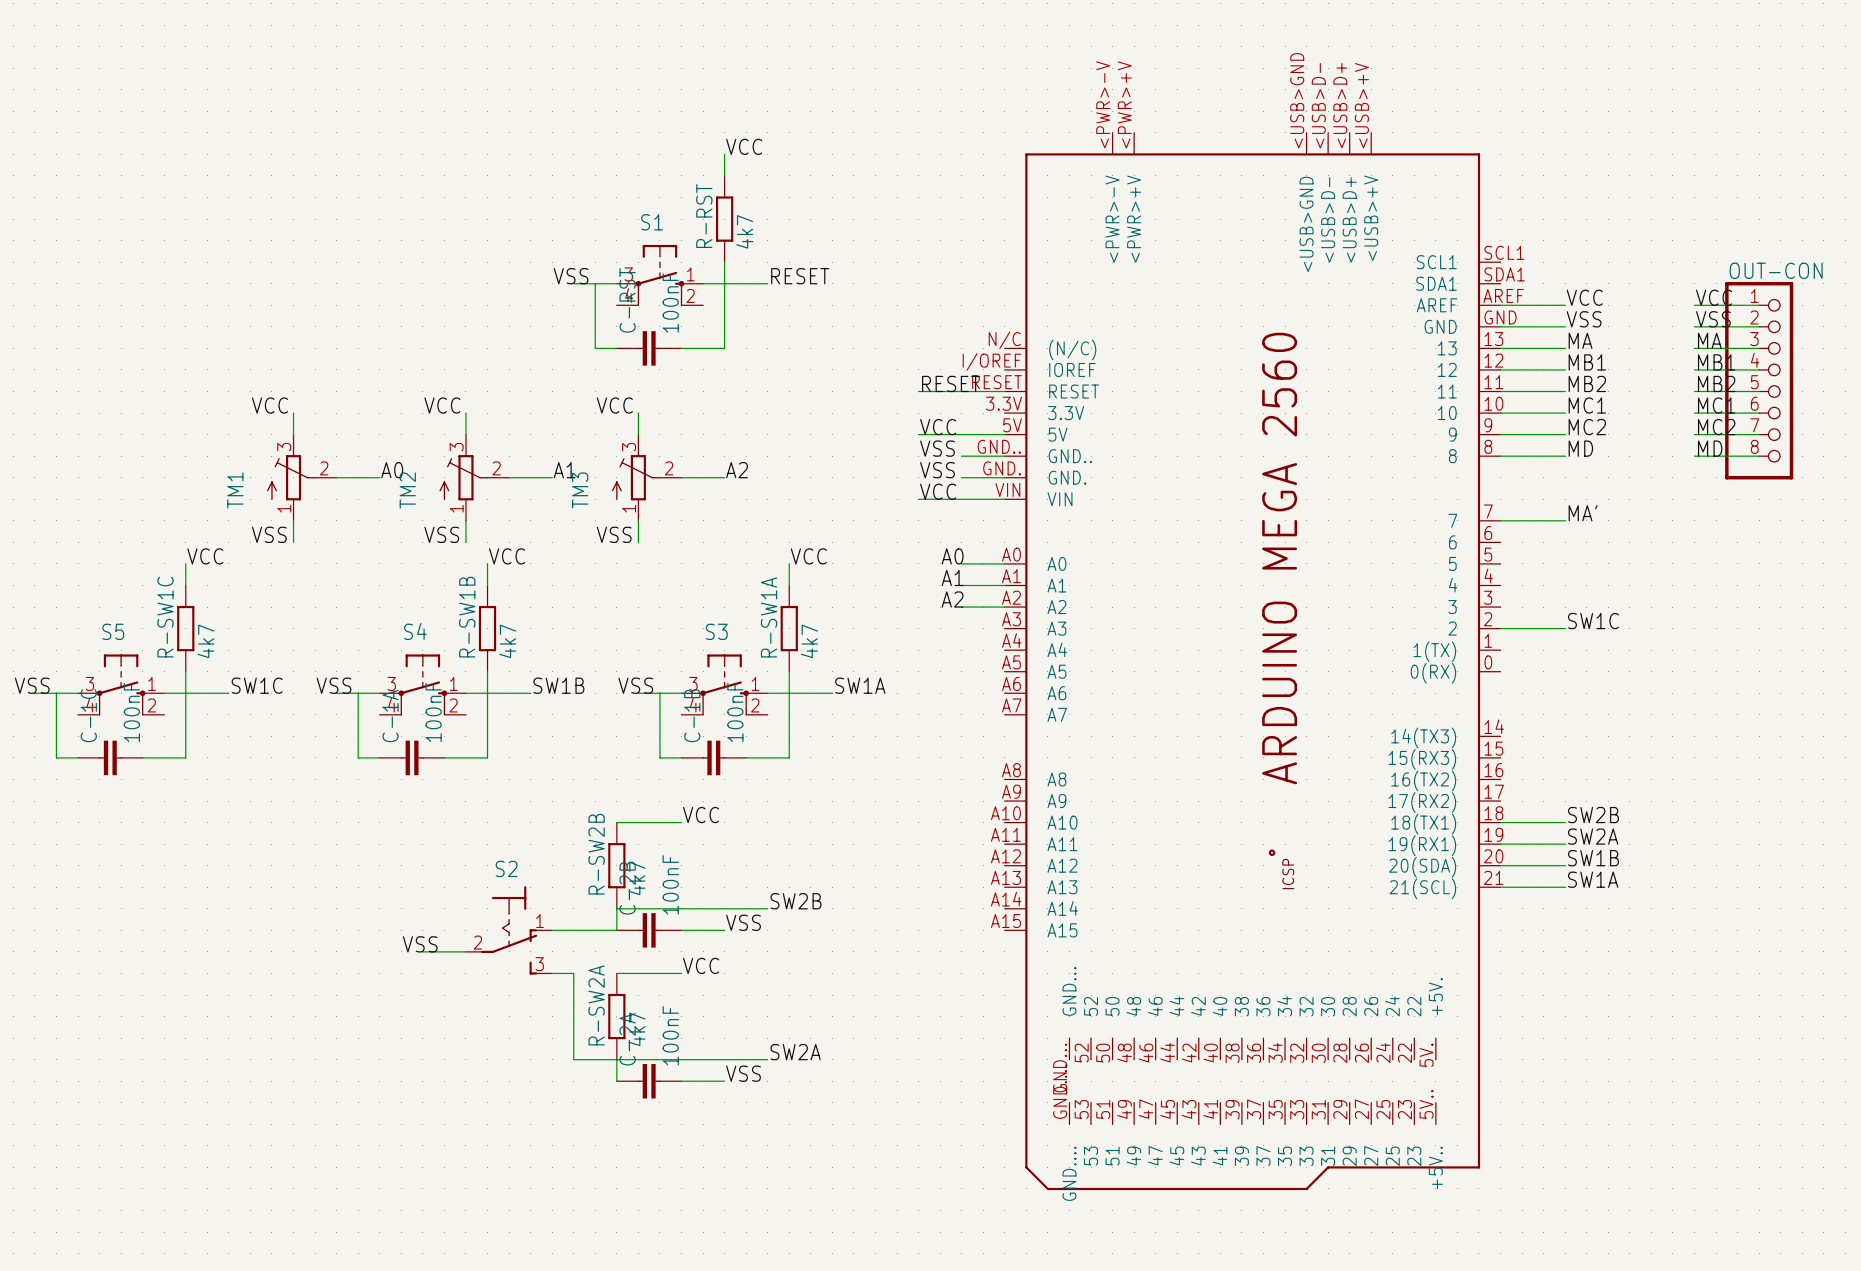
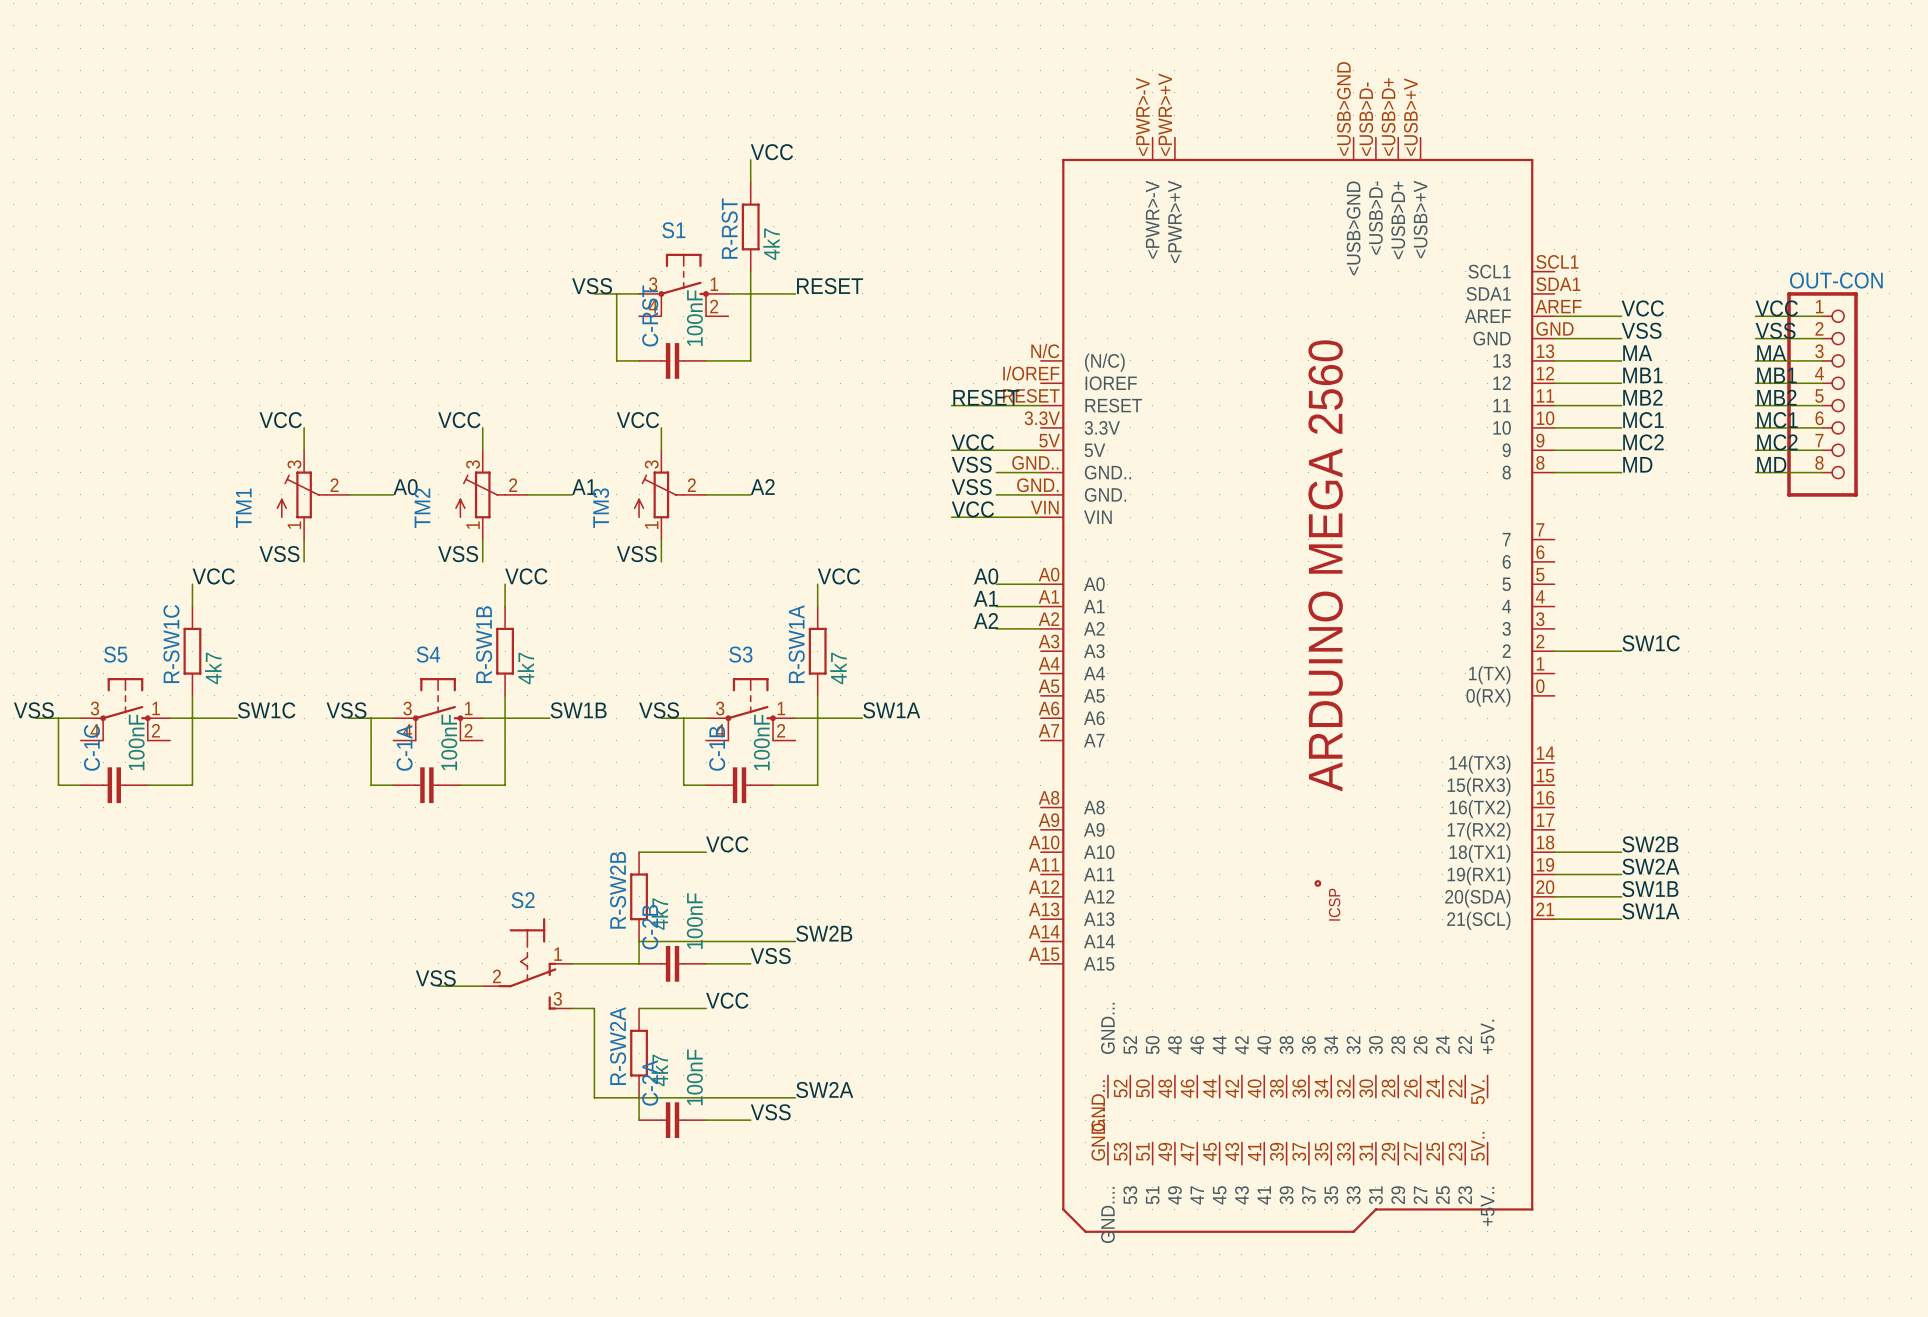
label: MA' (1583, 513) -> none
wire: (1500, 520) (1565, 520) -> none

